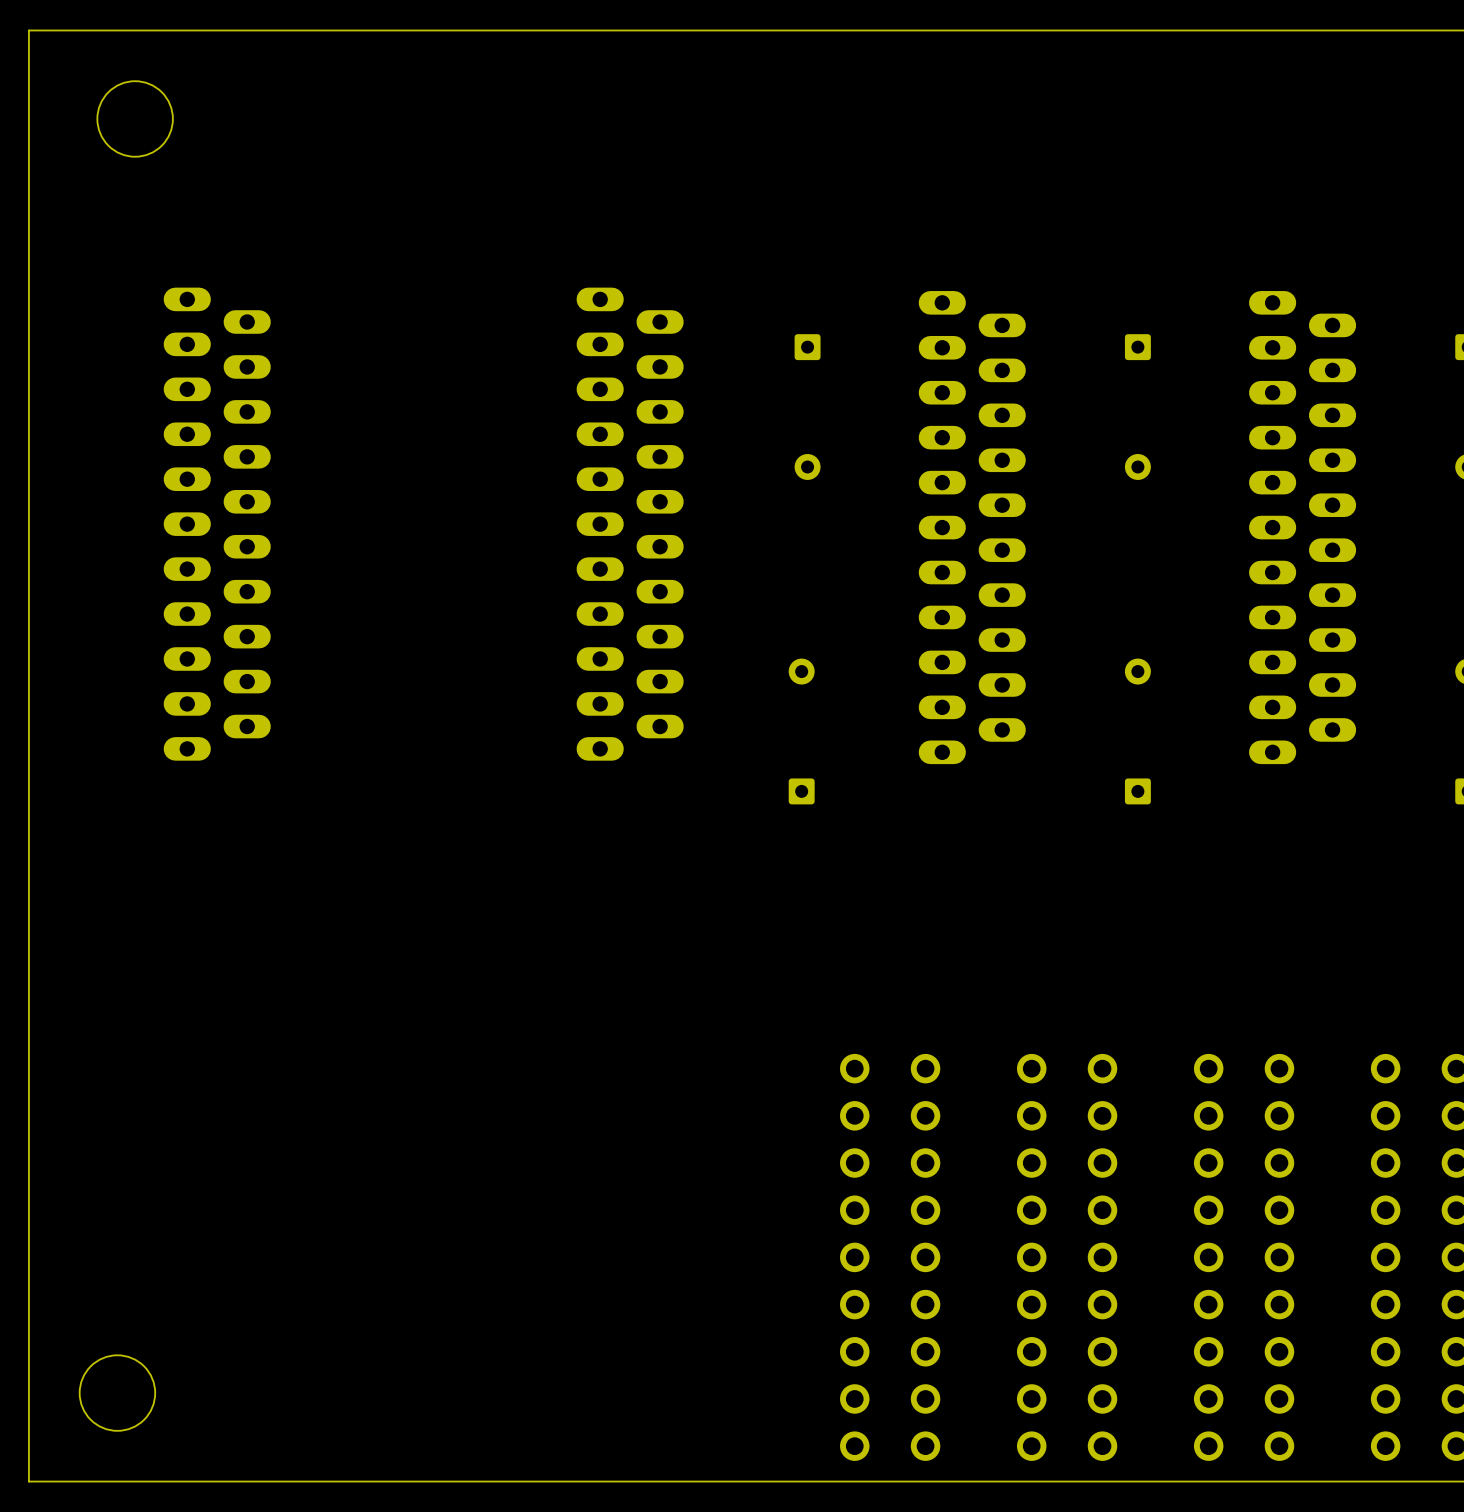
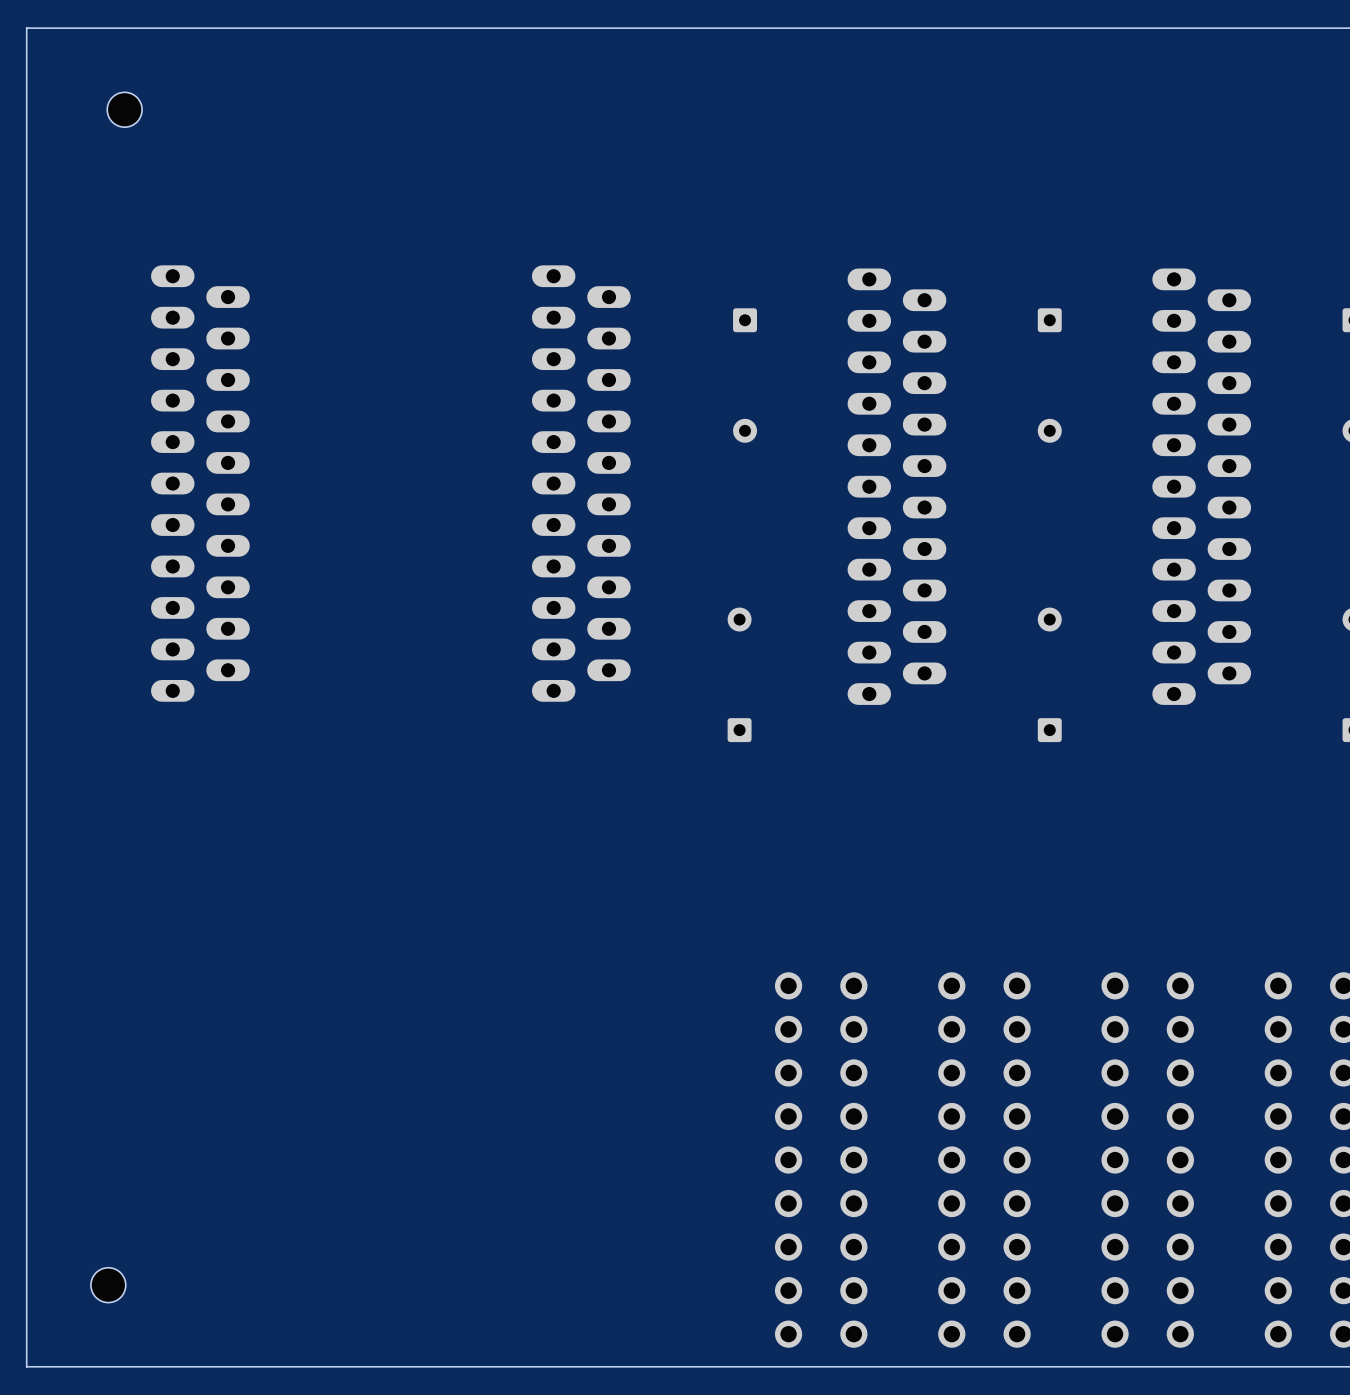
round board edge: [97, 80, 174, 158] -> none
part: none -> (124, 109)
round board edge: [79, 1355, 156, 1432] -> none
part: none -> (108, 1285)

